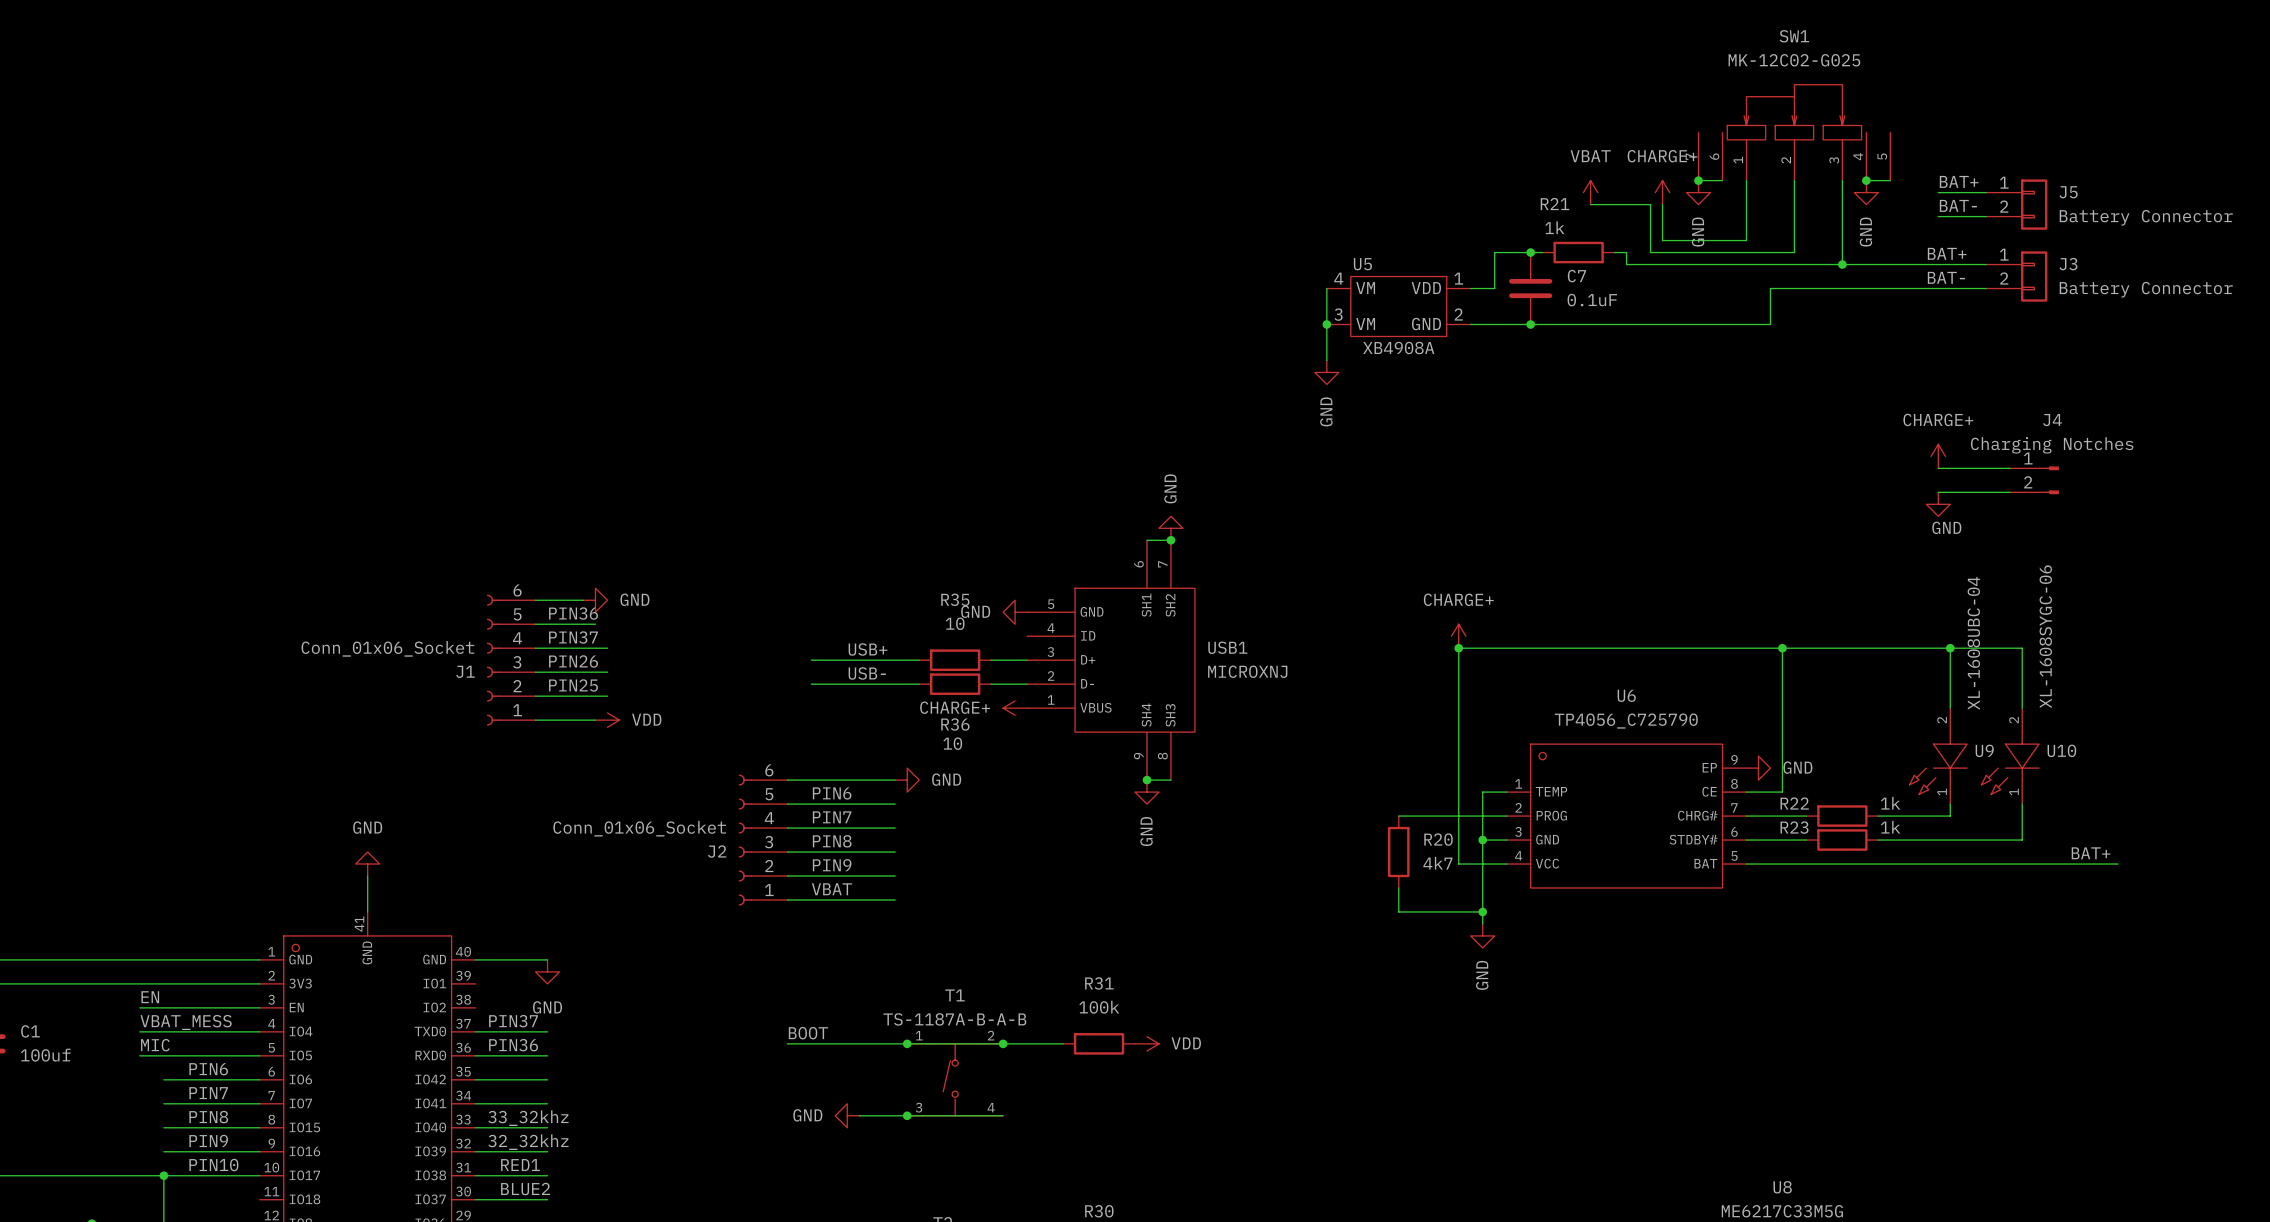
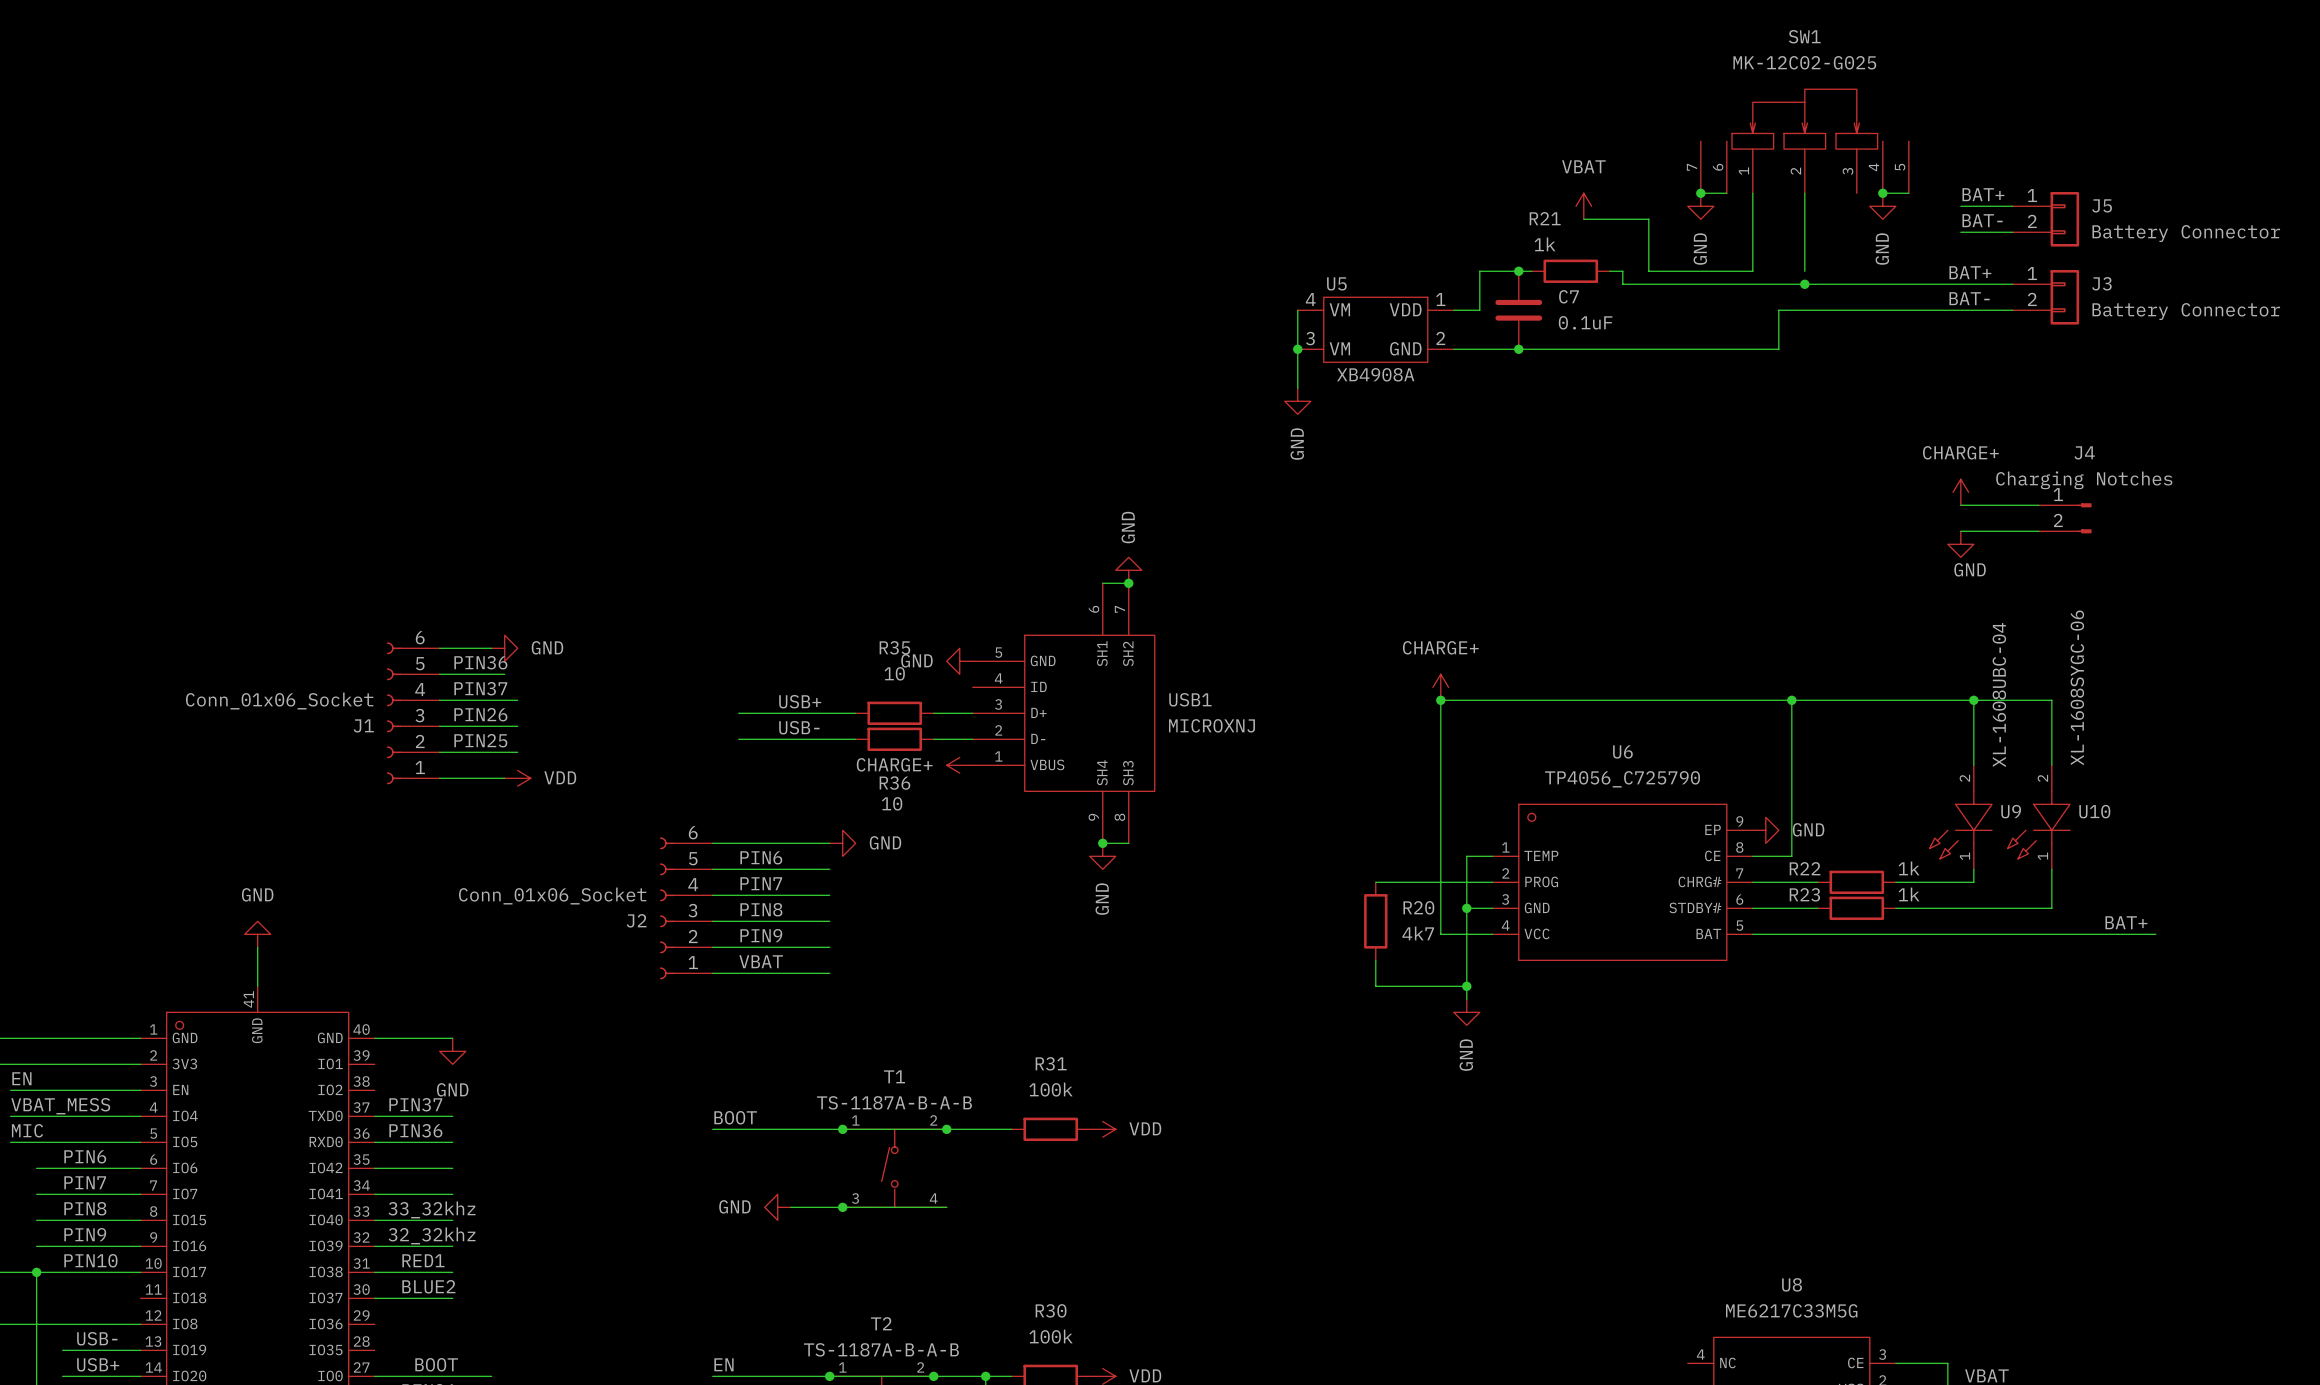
wire: (1842, 180) (1842, 264) -> none
power symbol: CHARGE+ (1662, 192) -> none
wire: (1662, 204) (1662, 240) (1746, 240) -> none
wire: (1746, 252) (1794, 252) -> (1752, 271) (1752, 258)
junction position: (1842, 264) -> (1804, 284)

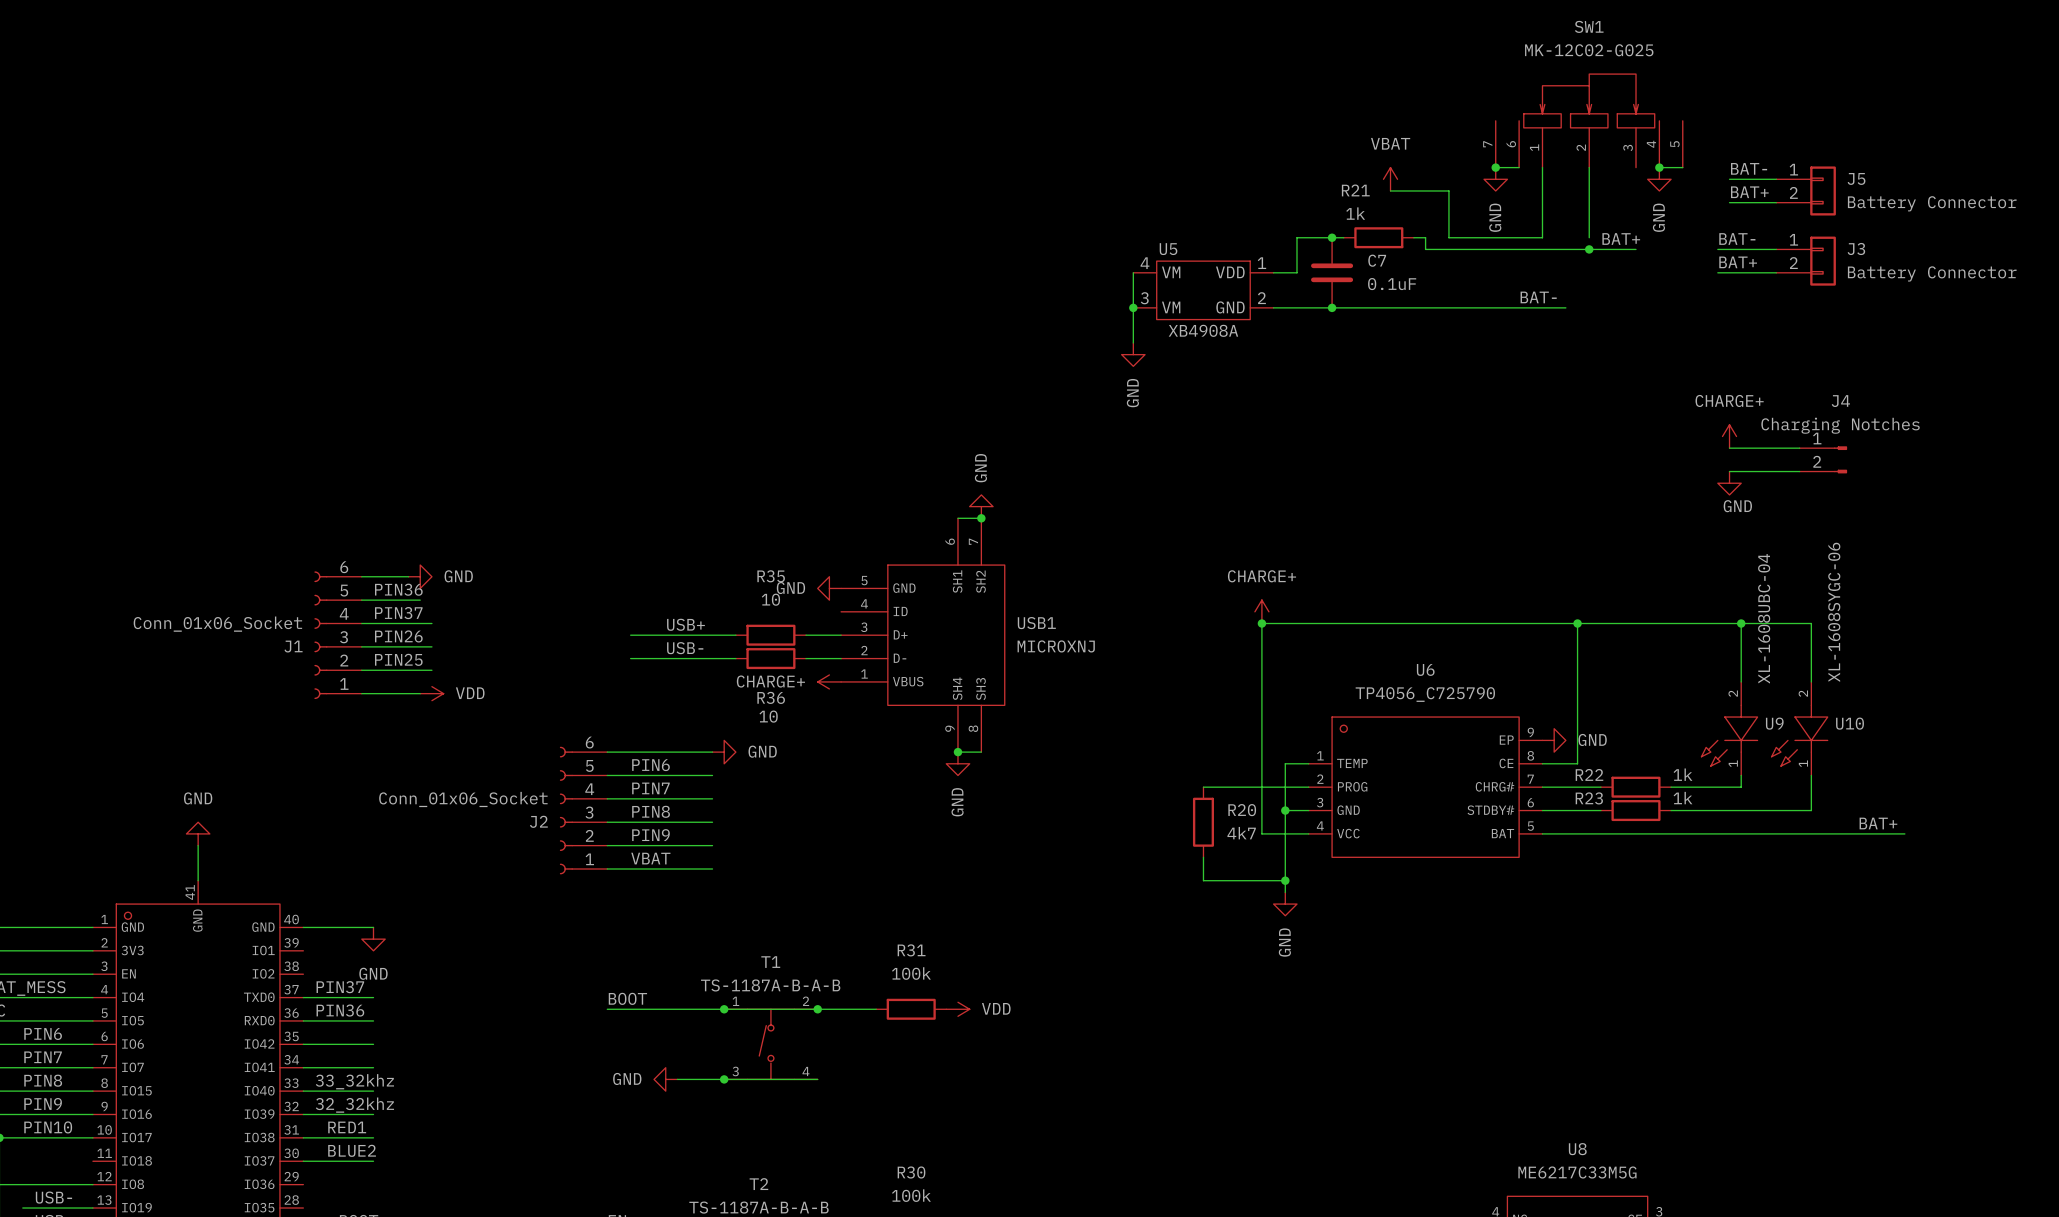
label: BAT+ (1983, 194) -> BAT- (1749, 168)
label: BAT- (1982, 220) -> BAT+ (1749, 192)
label: none -> BAT+ (1621, 239)
label: BAT+ (1970, 272) -> BAT- (1737, 239)
wire: (1856, 284) (1947, 284) -> none
label: BAT- (1969, 298) -> BAT+ (1738, 262)
wire: (1947, 310) (1778, 310) (1778, 349) -> none
label: none -> BAT- (1538, 297)

